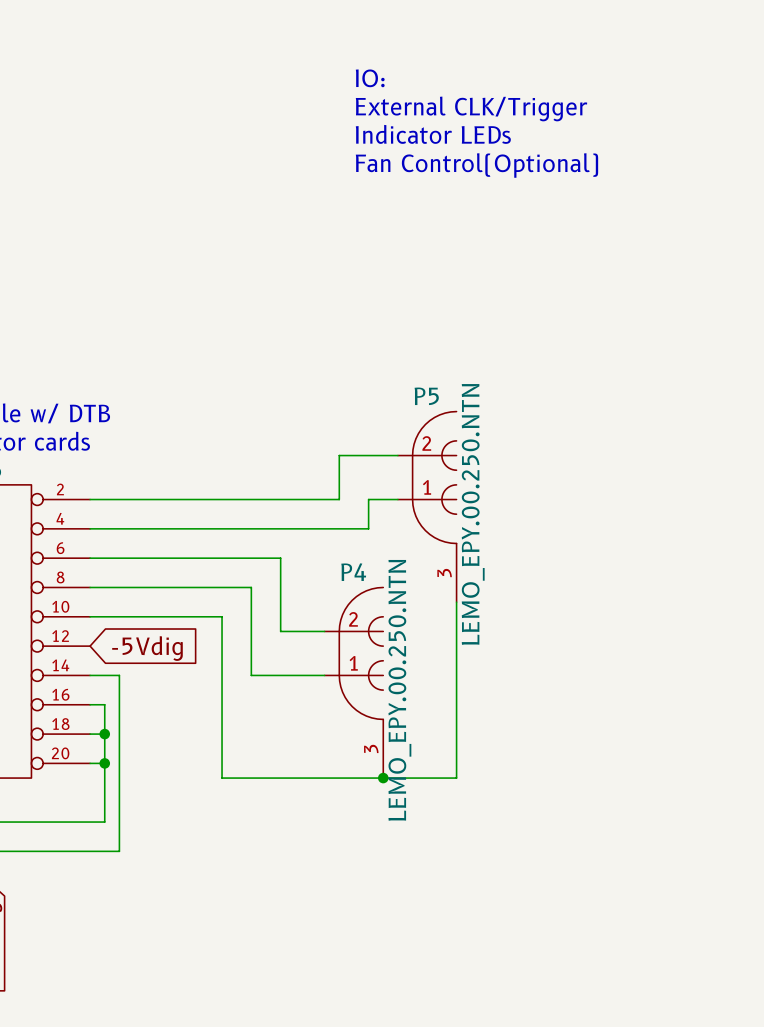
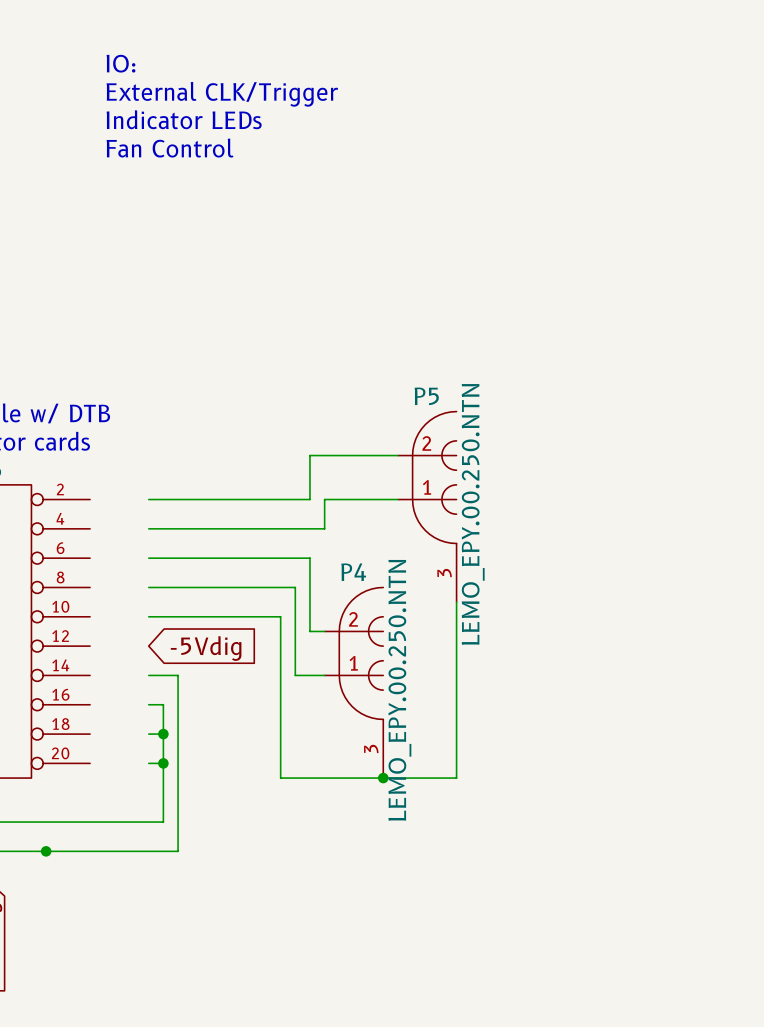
text position: IO: (370, 78) -> IO: (121, 63)
text position: External CLK/Trigger (471, 108) -> External CLK/Trigger (222, 94)
text position: Indicator LEDs (433, 134) -> Indicator LEDs (184, 119)
text: none -> Fan Control (170, 148)
text: Fan Control(Optional) (476, 165) -> none
wire: (339, 455) (339, 499) -> (339, 455) (309, 455) (309, 499)
wire: (90, 499) (148, 499) -> none
wire: (309, 499) (324, 499) -> (324, 528) (324, 499)
wire: (368, 499) (368, 528) (324, 528) -> (368, 499) (339, 499)
wire: (90, 528) (148, 528) -> none
wire: (90, 558) (148, 558) -> none
wire: (280, 558) (280, 616) -> (280, 558) (309, 558) (309, 631)
wire: (90, 587) (148, 587) -> none
wire: (251, 587) (251, 675) (295, 675) -> (251, 587) (295, 587) (295, 675)
wire: (90, 616) (148, 616) -> (222, 616) (280, 616)
wire: (222, 616) (222, 778) (280, 778) -> (280, 631) (280, 778)
wire: (280, 631) (309, 631) -> none
global label position: -5Vdig (147, 648) -> -5Vdig (206, 648)
wire: (90, 675) (119, 675) (119, 851) -> (148, 675) (178, 675) (178, 851) (119, 851)
wire: (90, 704) (104, 704) (104, 822) -> (148, 704) (163, 704) (163, 822) (104, 822)
wire: (90, 734) (104, 734) -> (148, 734) (163, 734)
junction: (104, 734) -> none
junction: none -> (163, 734)
wire: (90, 763) (104, 763) -> (148, 763) (163, 763)
junction: (104, 763) -> none
junction: none -> (163, 763)
junction: none -> (46, 851)

